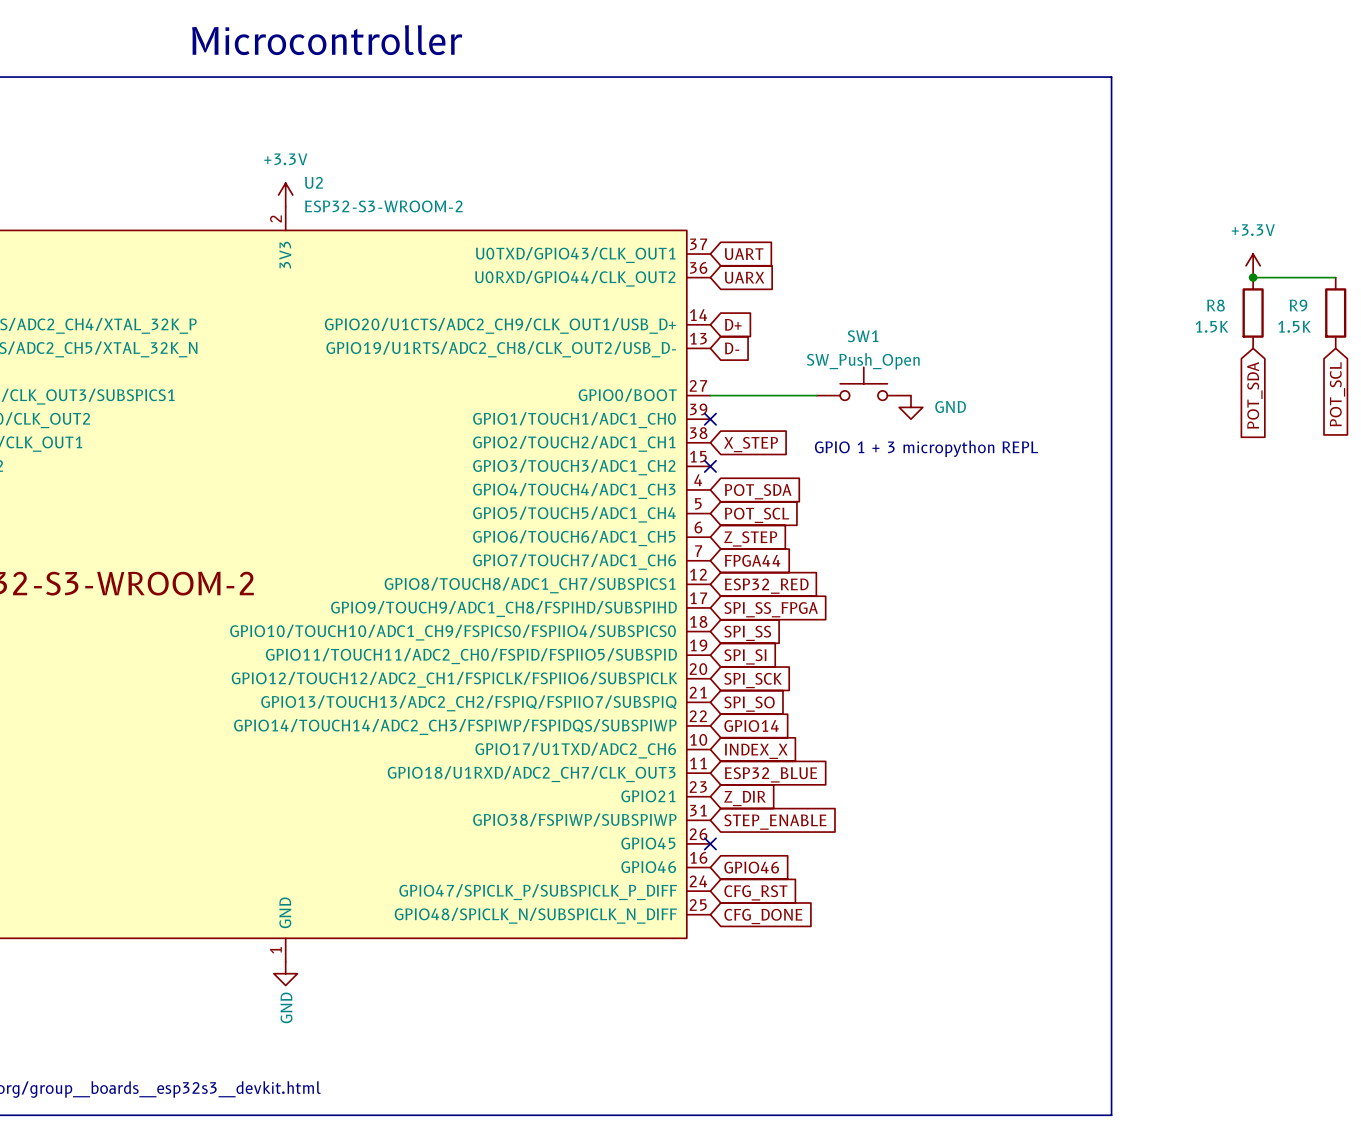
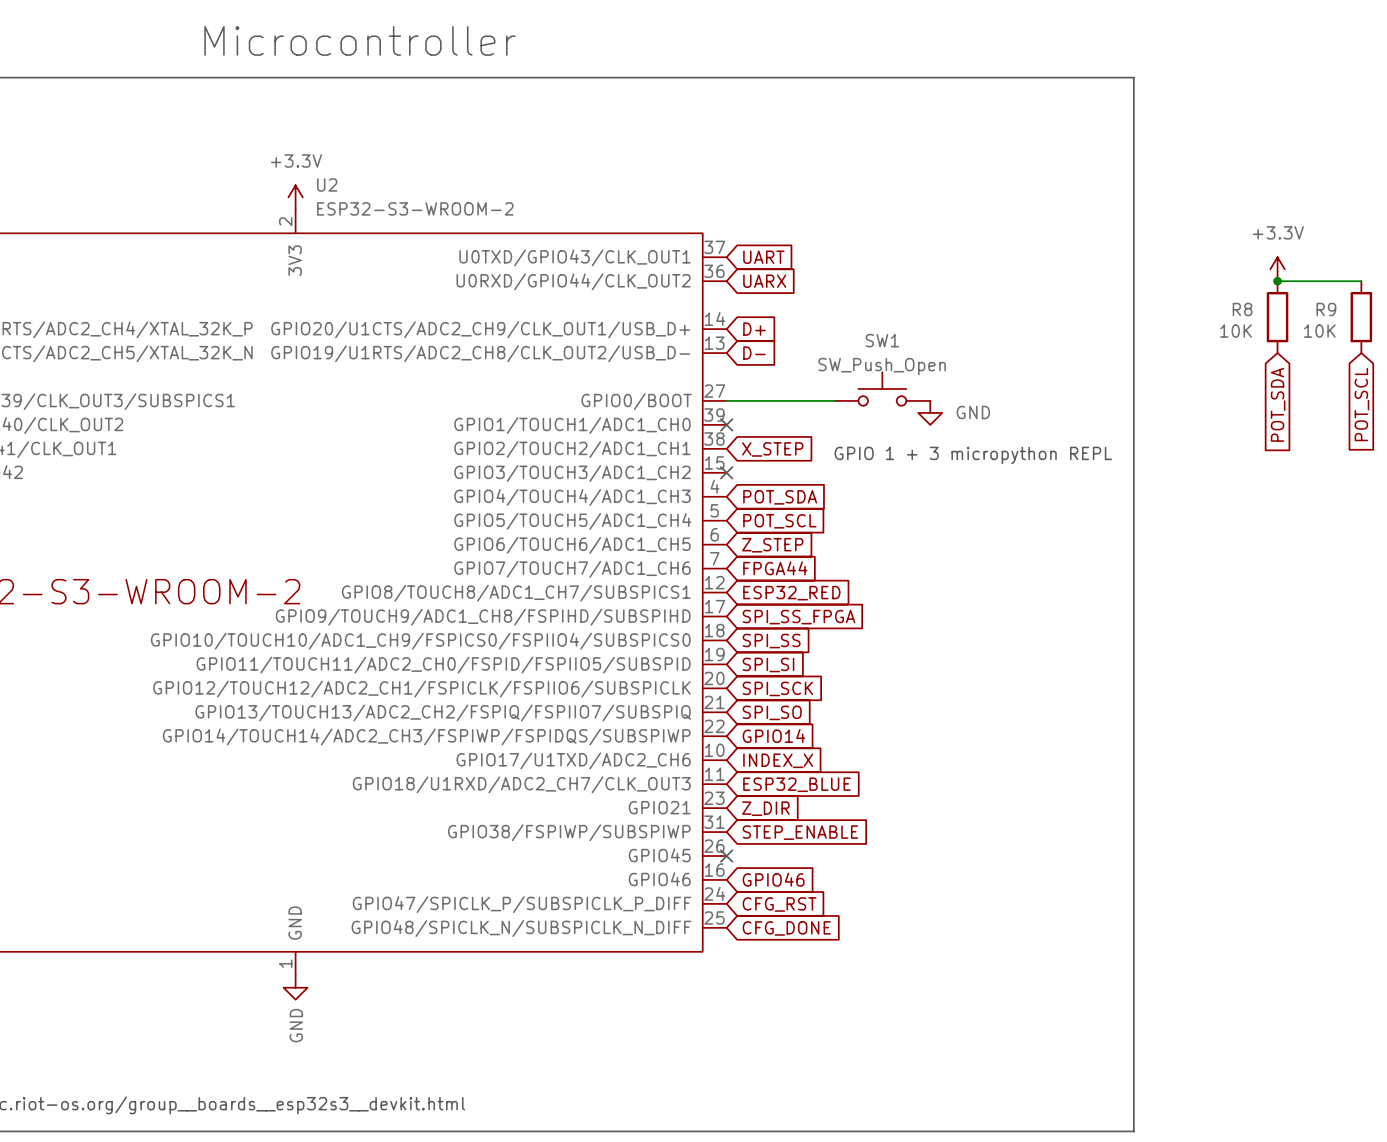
R8 value: 1.5K (1211, 326) -> 10K (1236, 331)
R9 value: 1.5K (1294, 326) -> 10K (1319, 331)

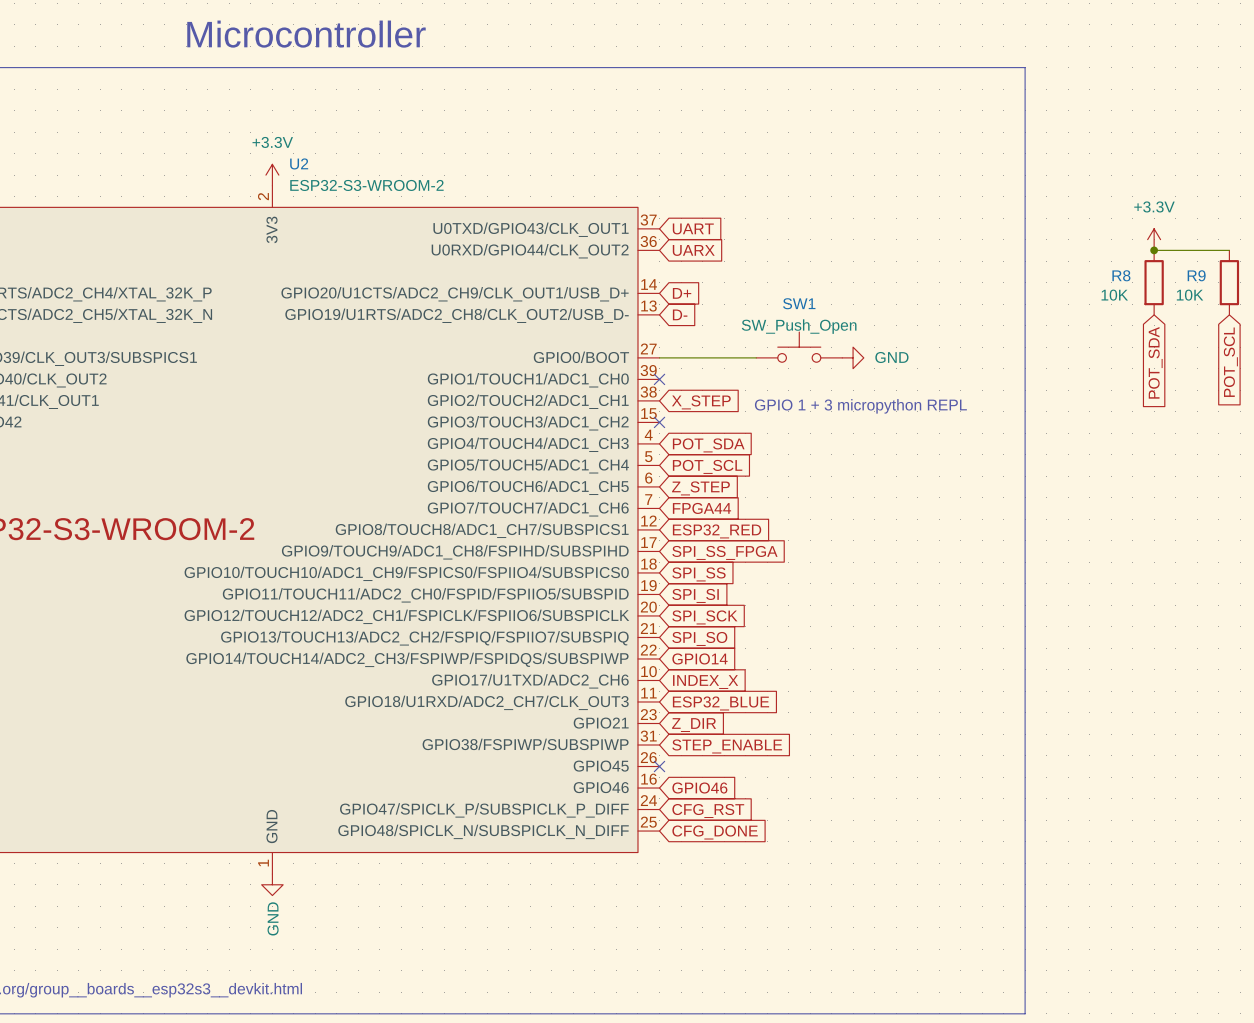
power symbol rotation: 0° (930, 412) -> 90° counterclockwise (853, 357)
power symbol position: GND (930, 412) -> GND (853, 357)

